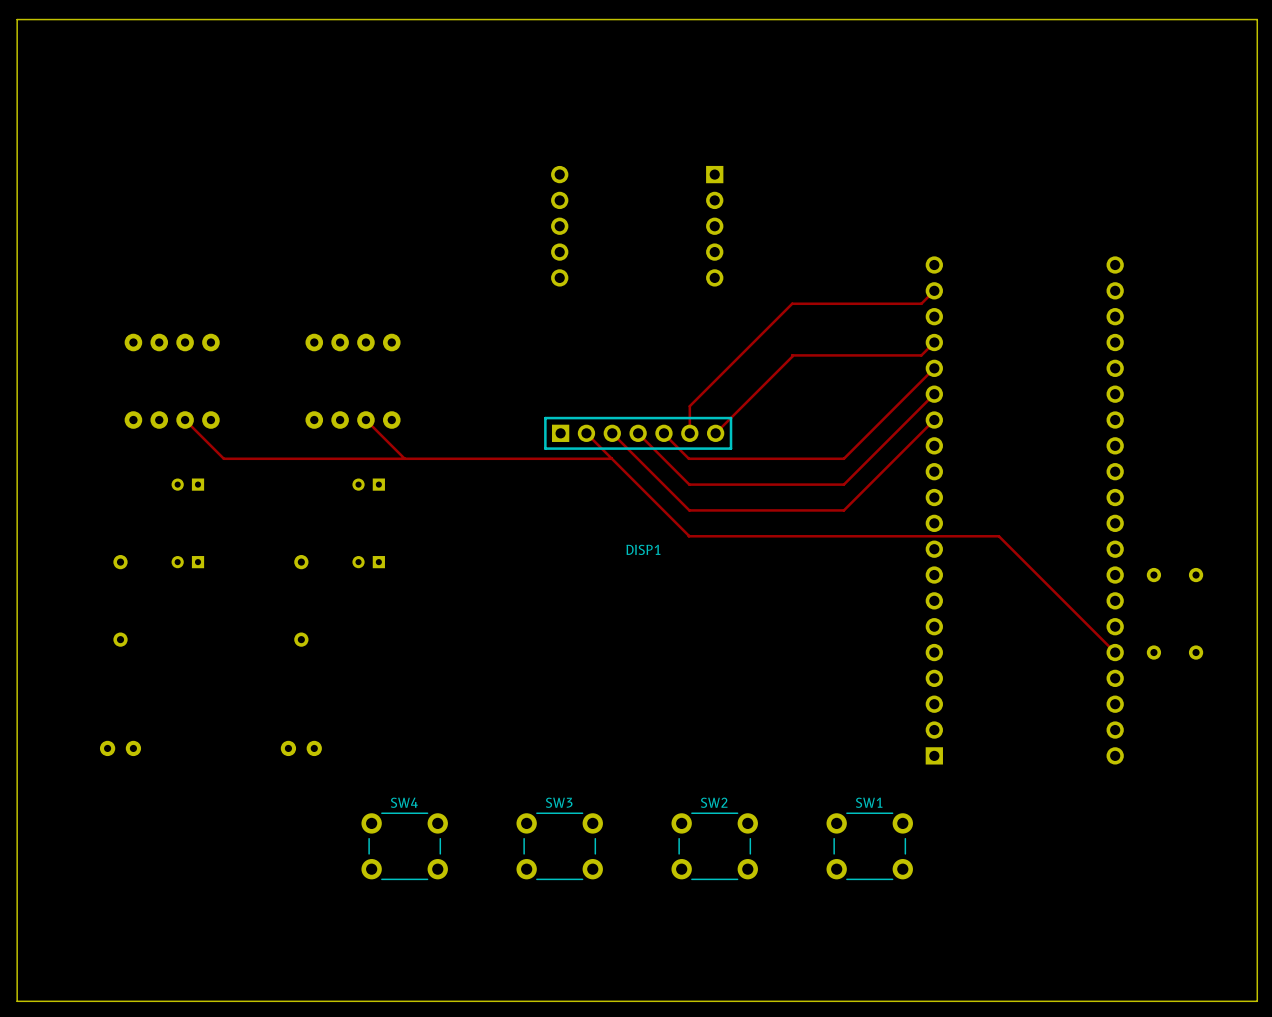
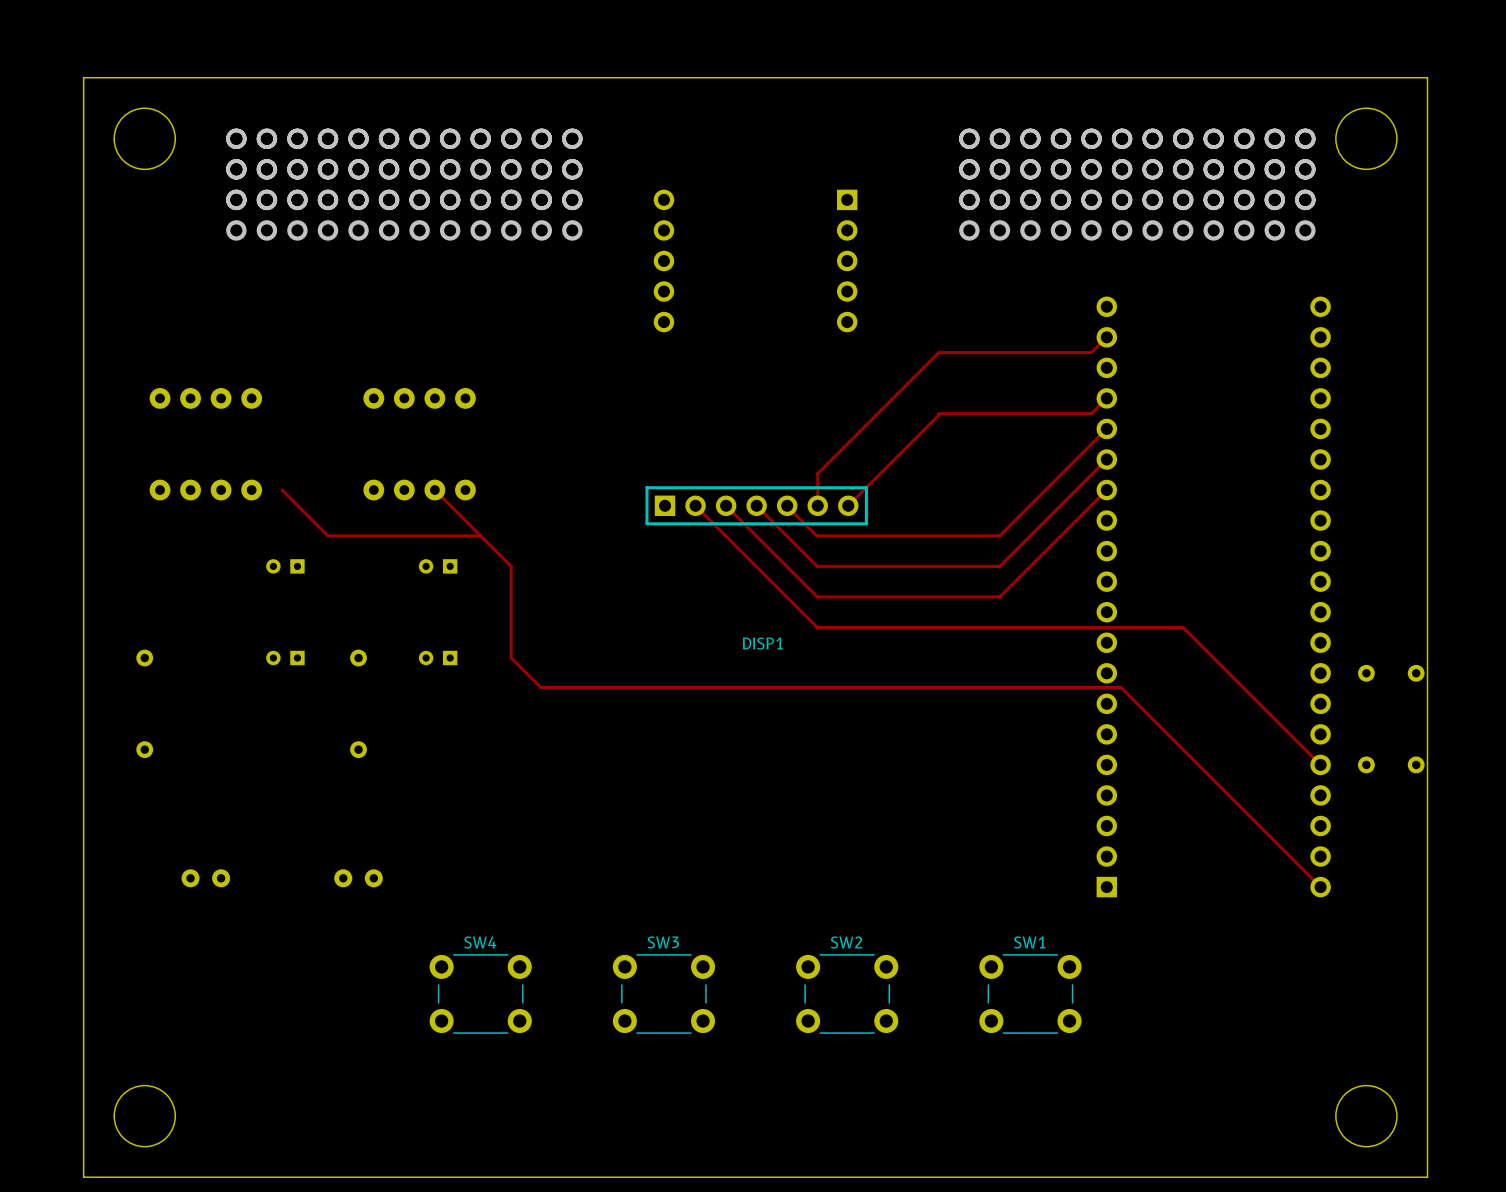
round board edge: none -> [113, 107, 176, 170]
round board edge: none -> [1335, 107, 1398, 170]
via: none -> (236, 138)
via: none -> (266, 138)
via: none -> (297, 138)
via: none -> (327, 138)
via: none -> (358, 138)
via: none -> (389, 138)
via: none -> (419, 138)
via: none -> (450, 138)
via: none -> (480, 138)
via: none -> (511, 138)
via: none -> (541, 138)
via: none -> (572, 138)
via: none -> (969, 138)
via: none -> (999, 138)
via: none -> (1030, 138)
via: none -> (1060, 138)
via: none -> (1091, 138)
via: none -> (1122, 138)
via: none -> (1152, 138)
via: none -> (1183, 138)
via: none -> (1213, 138)
via: none -> (1244, 138)
via: none -> (1274, 138)
via: none -> (1305, 138)
via: none -> (236, 169)
via: none -> (266, 169)
via: none -> (297, 169)
via: none -> (327, 169)
via: none -> (358, 169)
via: none -> (389, 169)
via: none -> (419, 169)
via: none -> (450, 169)
via: none -> (480, 169)
via: none -> (511, 169)
via: none -> (541, 169)
via: none -> (572, 169)
via: none -> (969, 169)
via: none -> (999, 169)
via: none -> (1030, 169)
via: none -> (1060, 169)
via: none -> (1091, 169)
via: none -> (1122, 169)
via: none -> (1152, 169)
via: none -> (1183, 169)
via: none -> (1213, 169)
via: none -> (1244, 169)
via: none -> (1274, 169)
via: none -> (1305, 169)
via: none -> (236, 199)
via: none -> (266, 199)
via: none -> (297, 199)
via: none -> (327, 199)
via: none -> (358, 199)
via: none -> (389, 199)
via: none -> (419, 199)
via: none -> (450, 199)
via: none -> (480, 199)
via: none -> (511, 199)
via: none -> (541, 199)
via: none -> (572, 199)
via: none -> (969, 199)
via: none -> (999, 199)
via: none -> (1030, 199)
via: none -> (1060, 199)
via: none -> (1091, 199)
via: none -> (1122, 199)
via: none -> (1152, 199)
via: none -> (1183, 199)
via: none -> (1213, 199)
via: none -> (1244, 199)
via: none -> (1274, 199)
via: none -> (1305, 199)
via: none -> (236, 230)
via: none -> (266, 230)
via: none -> (297, 230)
via: none -> (327, 230)
via: none -> (358, 230)
via: none -> (389, 230)
via: none -> (419, 230)
via: none -> (450, 230)
via: none -> (480, 230)
via: none -> (511, 230)
via: none -> (541, 230)
via: none -> (572, 230)
via: none -> (969, 230)
via: none -> (999, 230)
via: none -> (1030, 230)
via: none -> (1060, 230)
via: none -> (1091, 230)
via: none -> (1122, 230)
via: none -> (1152, 230)
via: none -> (1183, 230)
via: none -> (1213, 230)
via: none -> (1244, 230)
via: none -> (1274, 230)
via: none -> (1305, 230)
track: (185, 420) (223, 458) (275, 458) -> (282, 490) (327, 535)
track: (404, 458) (611, 458) -> (480, 535) (511, 566) (511, 658) (540, 687) (1120, 687) (1320, 887)
part: (187, 484) -> none
part: none -> (285, 566)
part: (187, 562) -> none
part: none -> (285, 658)
part position: (120, 748) -> (205, 878)
round board edge: none -> [113, 1084, 176, 1148]
round board edge: none -> [1335, 1084, 1398, 1148]
board edge: (68, 1001) (17, 1001) (17, 19) (1257, 19) (1257, 1001) (1205, 1001) -> (83, 1177) (83, 77) (1427, 77) (1427, 1177)

